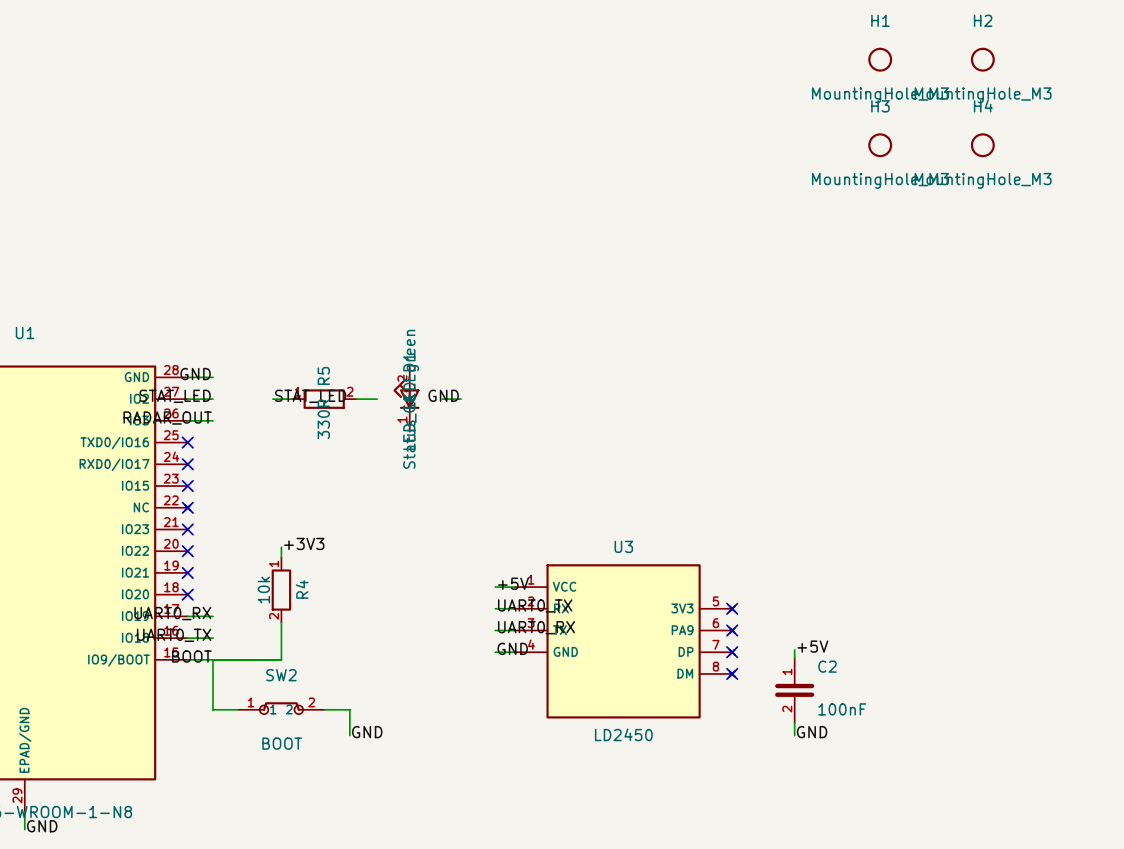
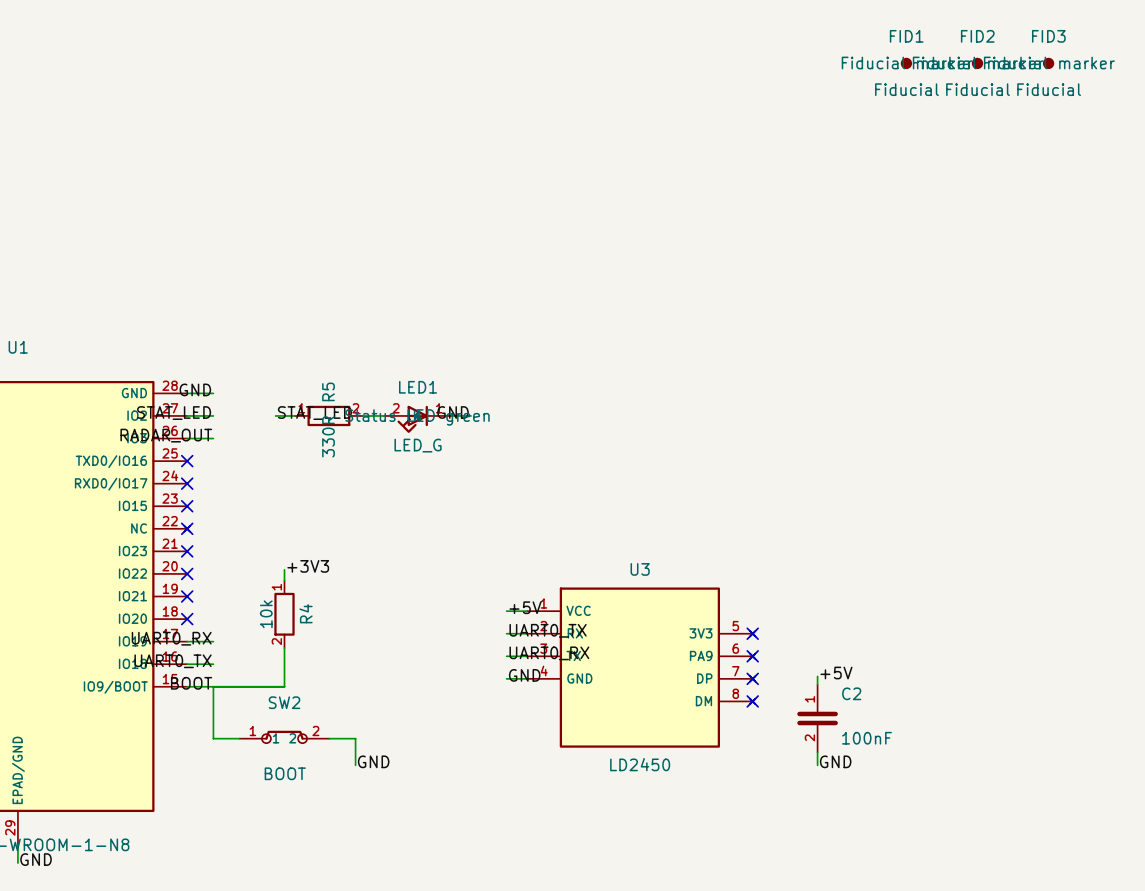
H1: MountingHole_M3 (880, 59) -> none
FID1: none -> Fiducial (906, 63)
FID2: none -> Fiducial (977, 63)
H2: MountingHole_M3 (982, 59) -> none
FID3: none -> Fiducial (1048, 63)
H3: MountingHole_M3 (880, 145) -> none
H4: MountingHole_M3 (982, 145) -> none
LED1 rotation: 0° (406, 394) -> 90° counterclockwise (412, 419)

